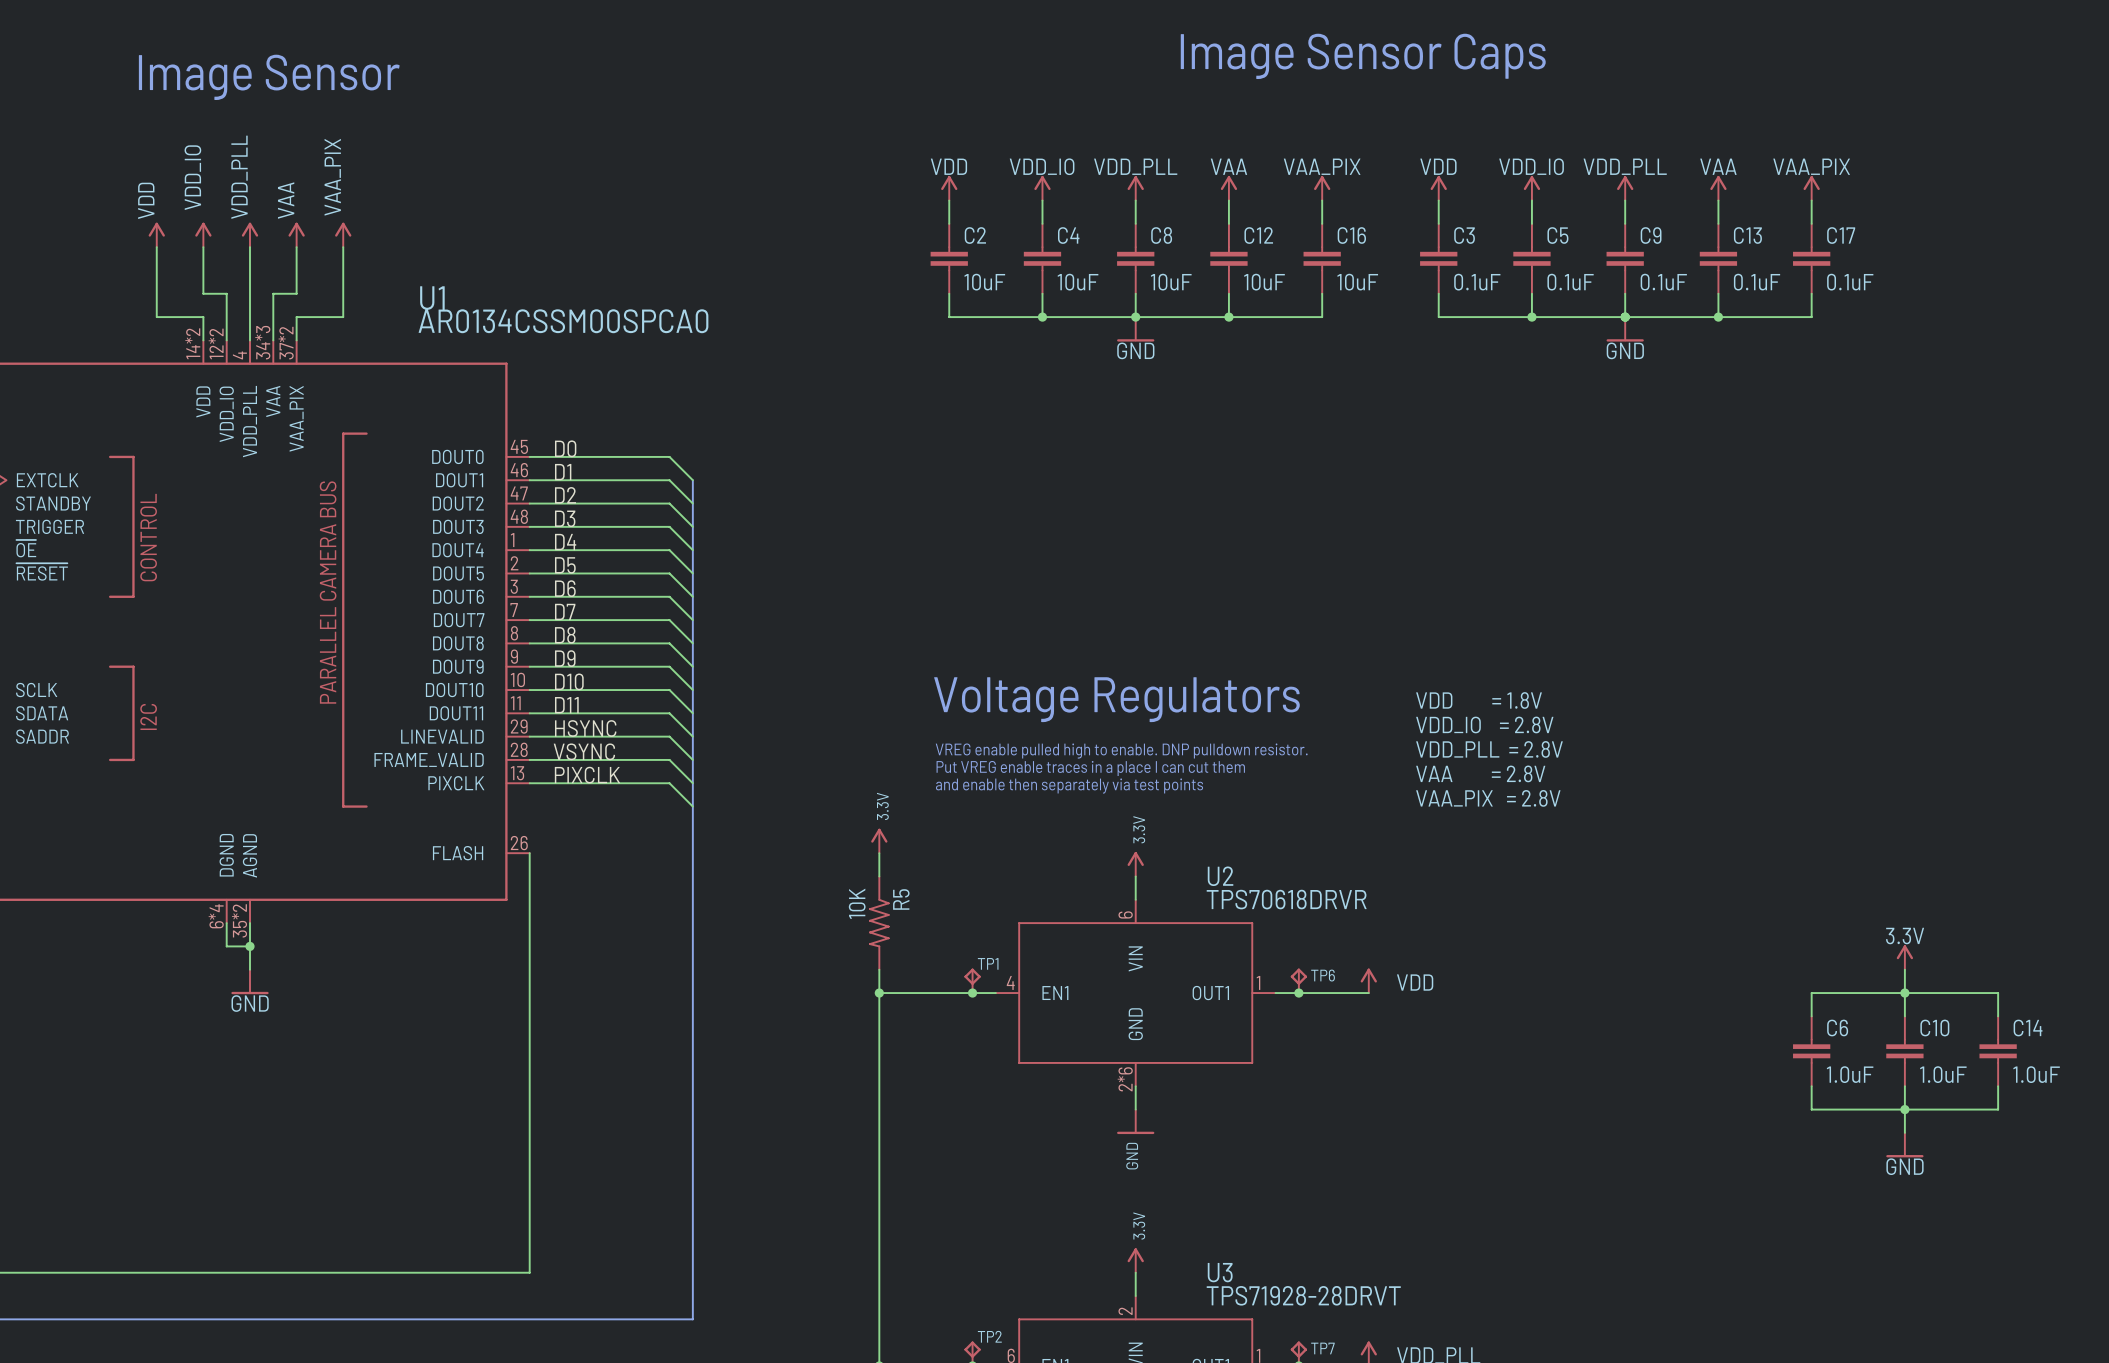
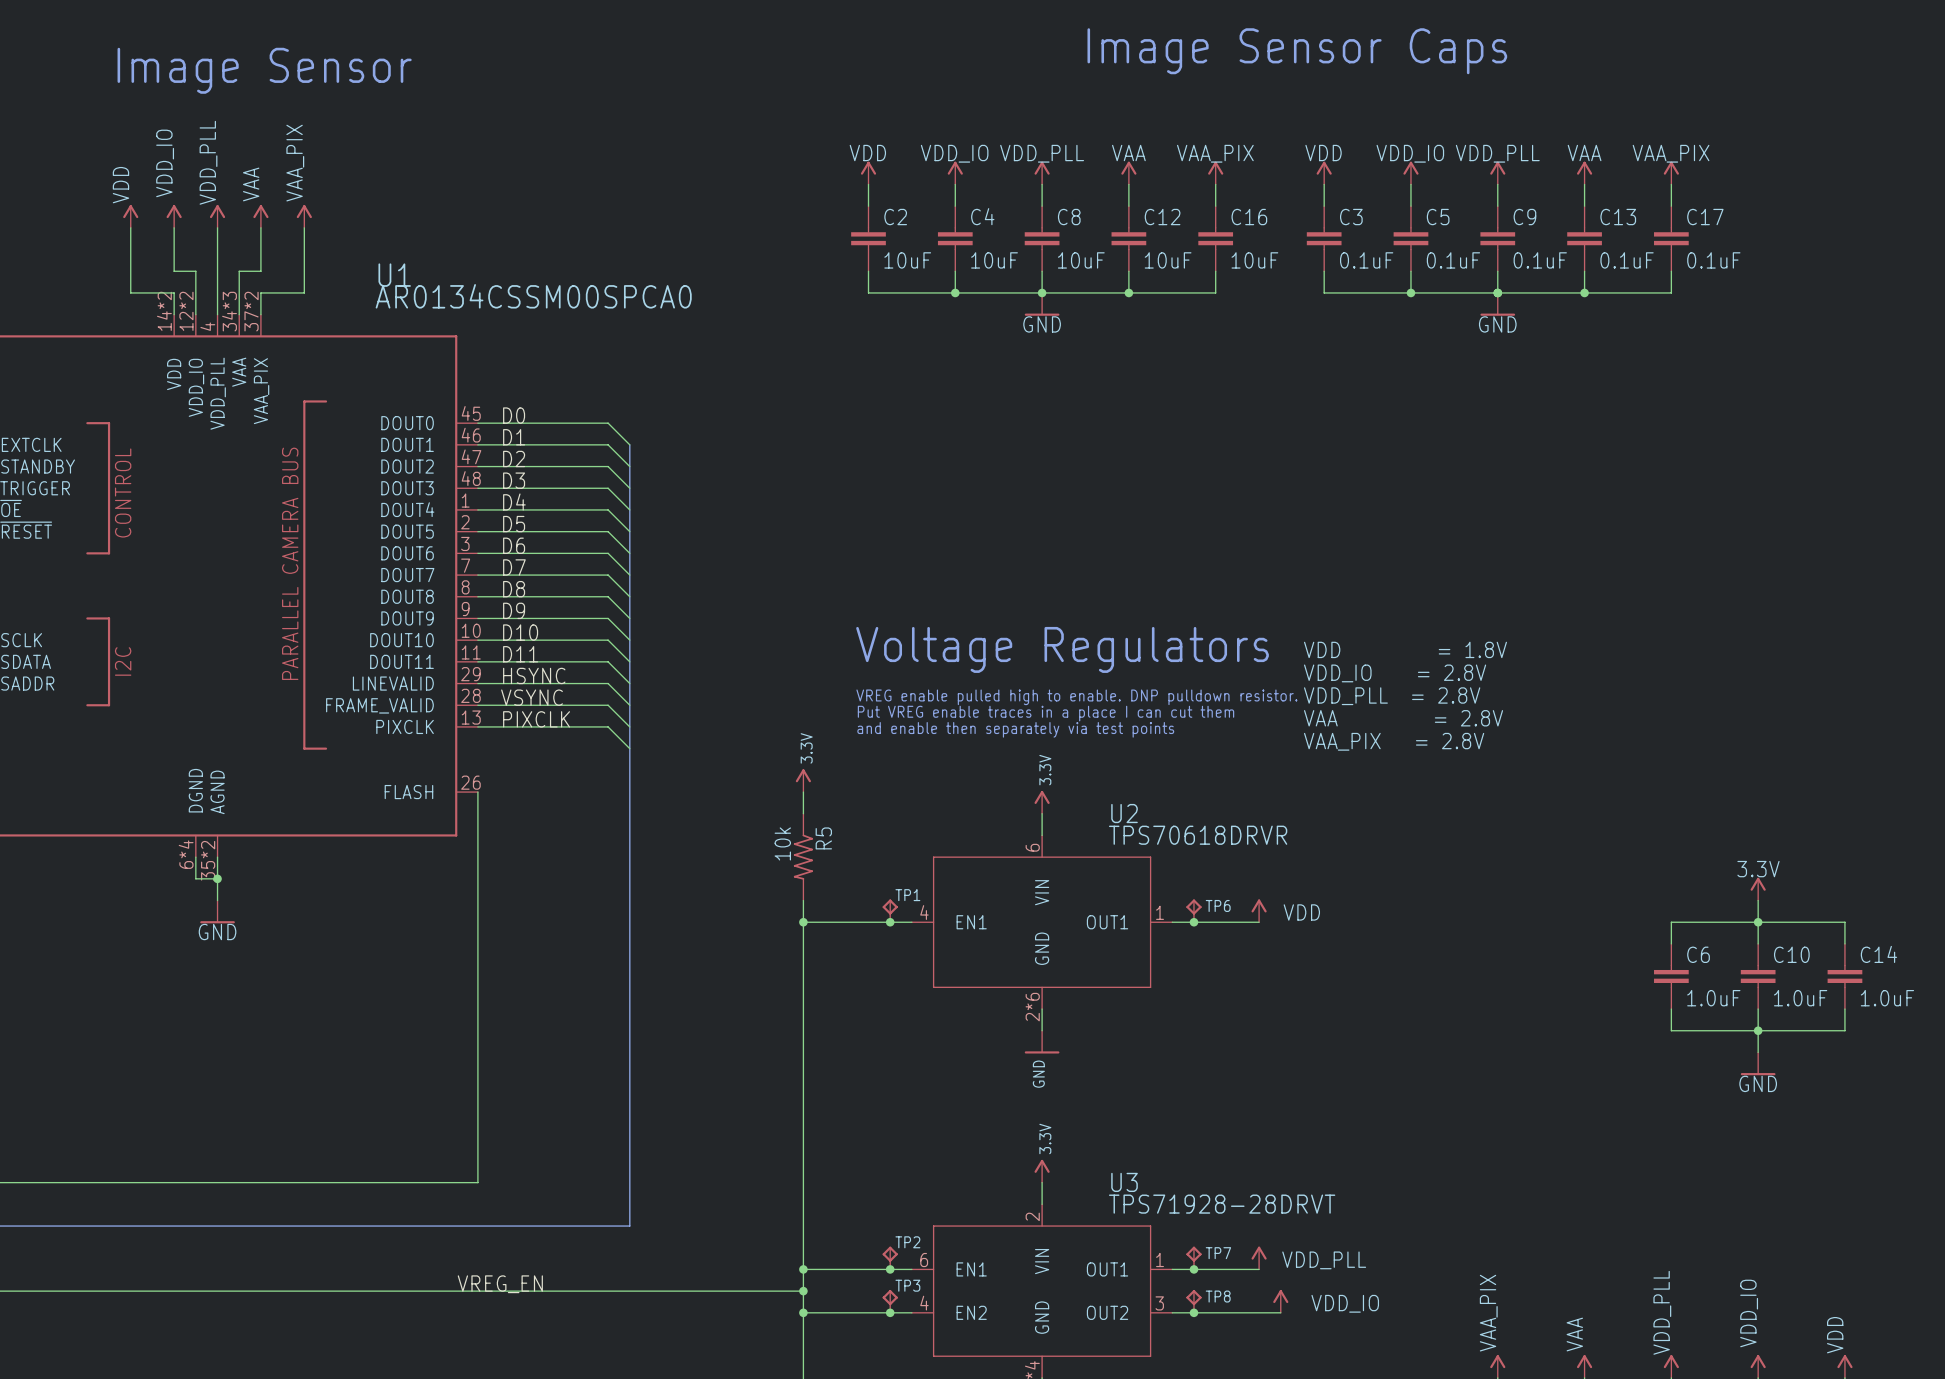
R5 value: 10K (857, 903) -> 10k (782, 843)

